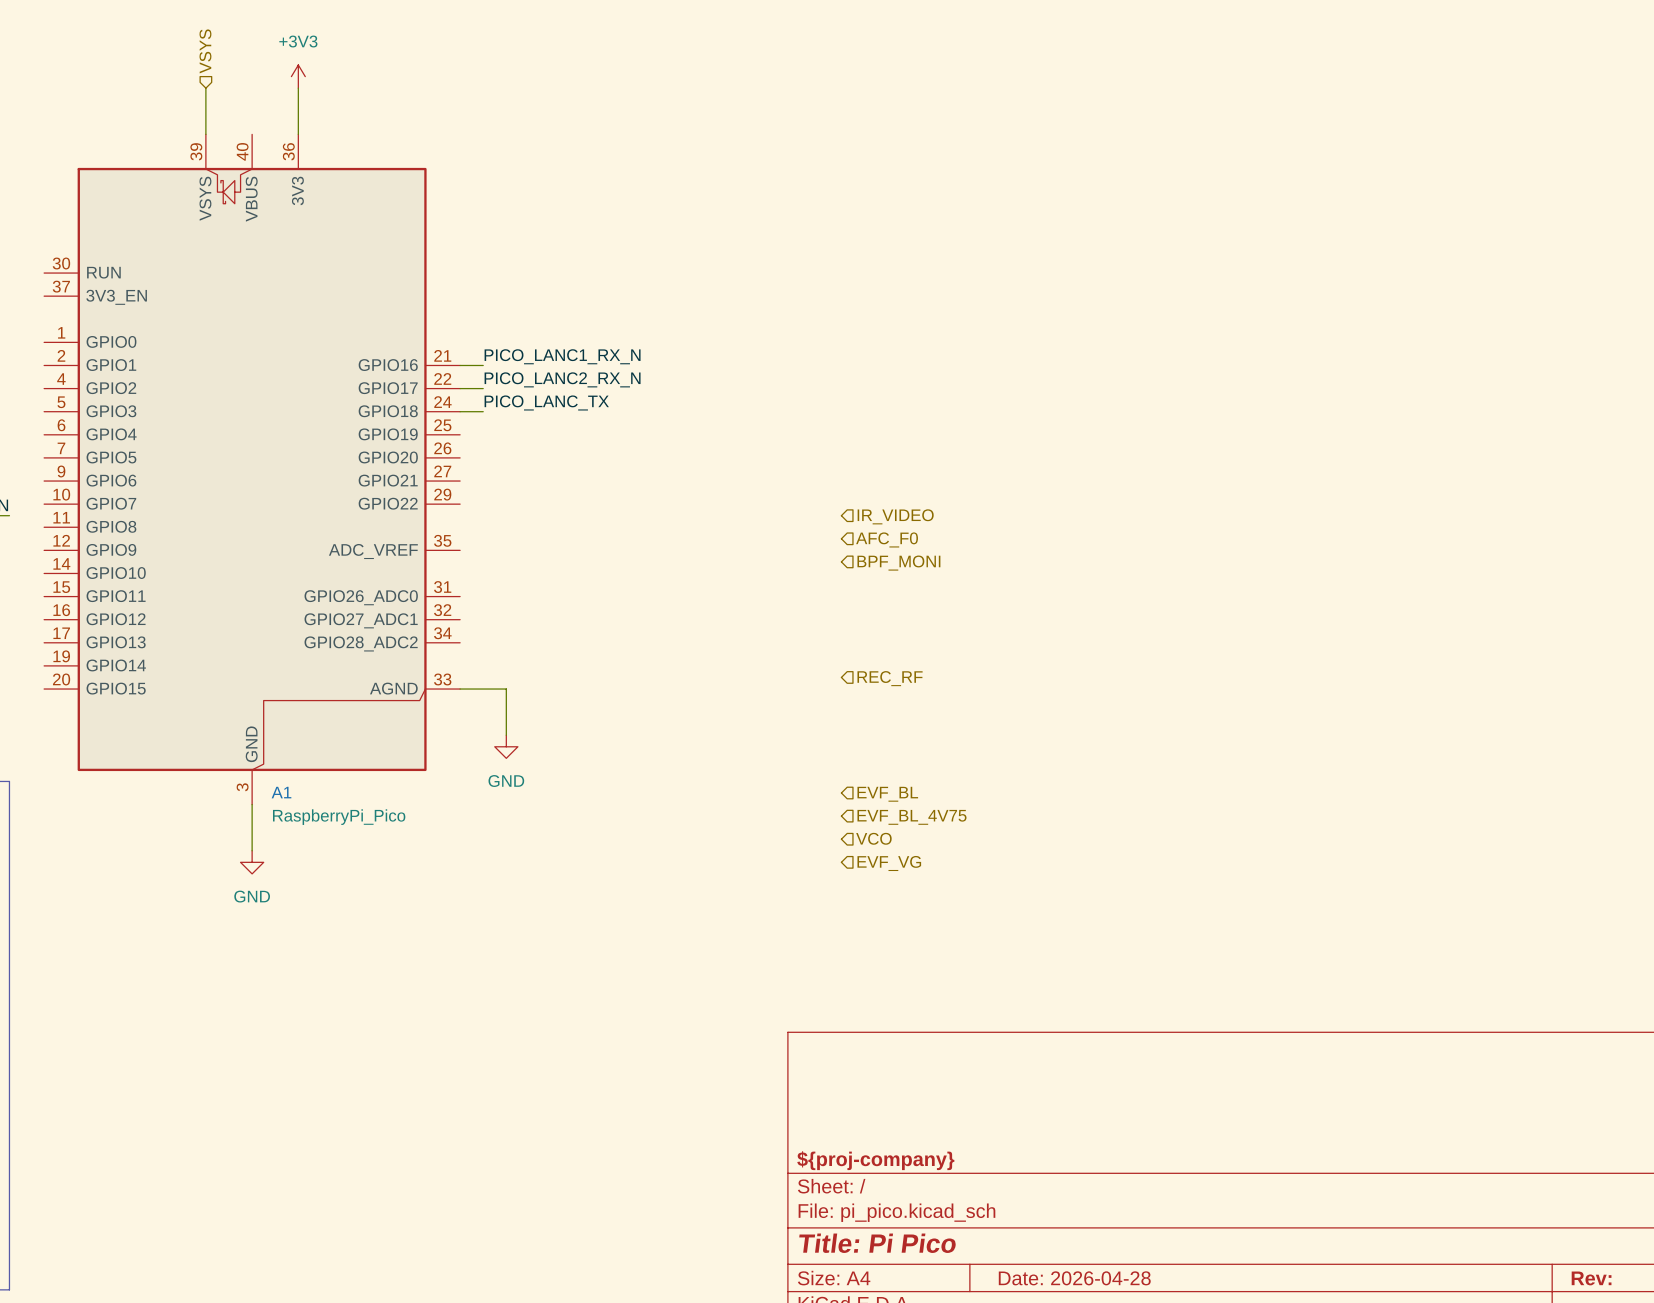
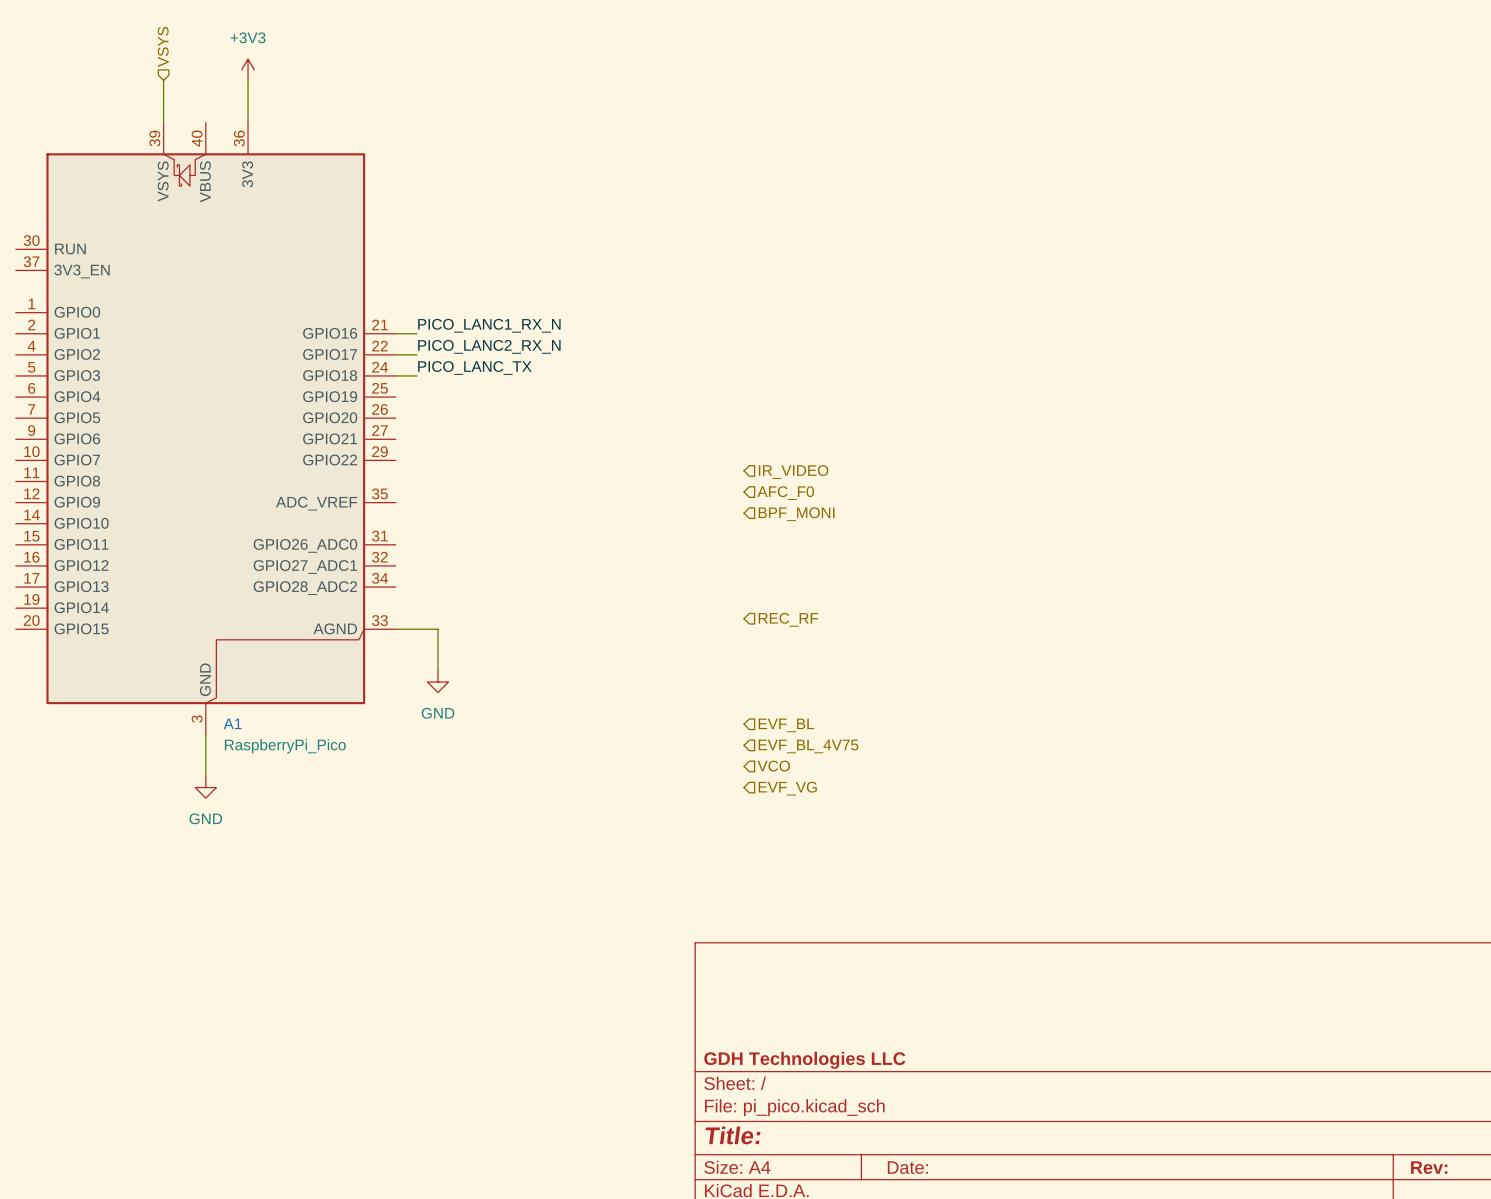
title block: ${proj-company} (875, 1160) -> GDH Technologies LLC (804, 1060)
title block: Title: Pi Pico (877, 1243) -> Title: (732, 1135)
title block: Date: 2026-04-28 (1074, 1278) -> Date: (907, 1167)

